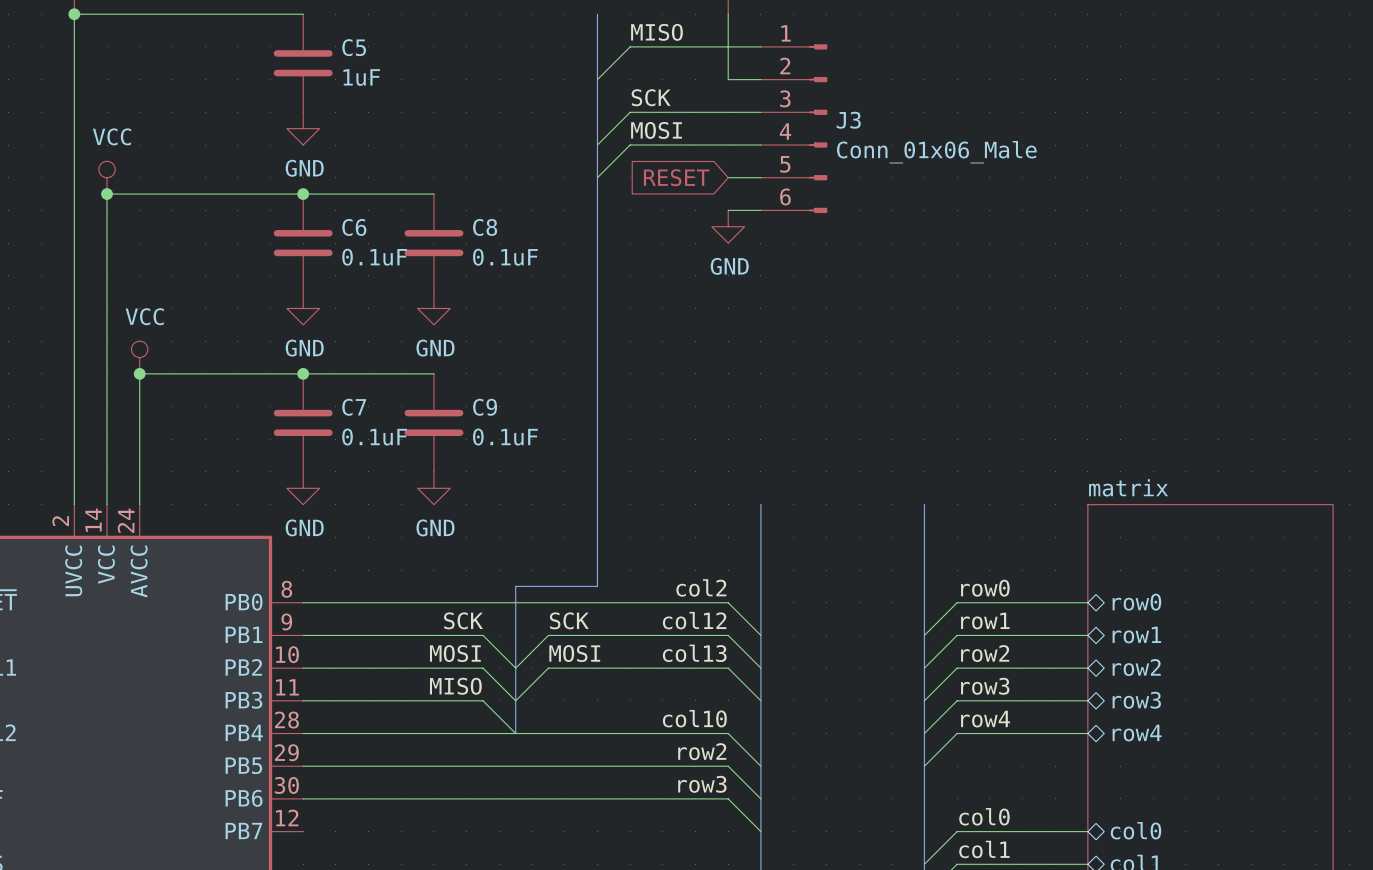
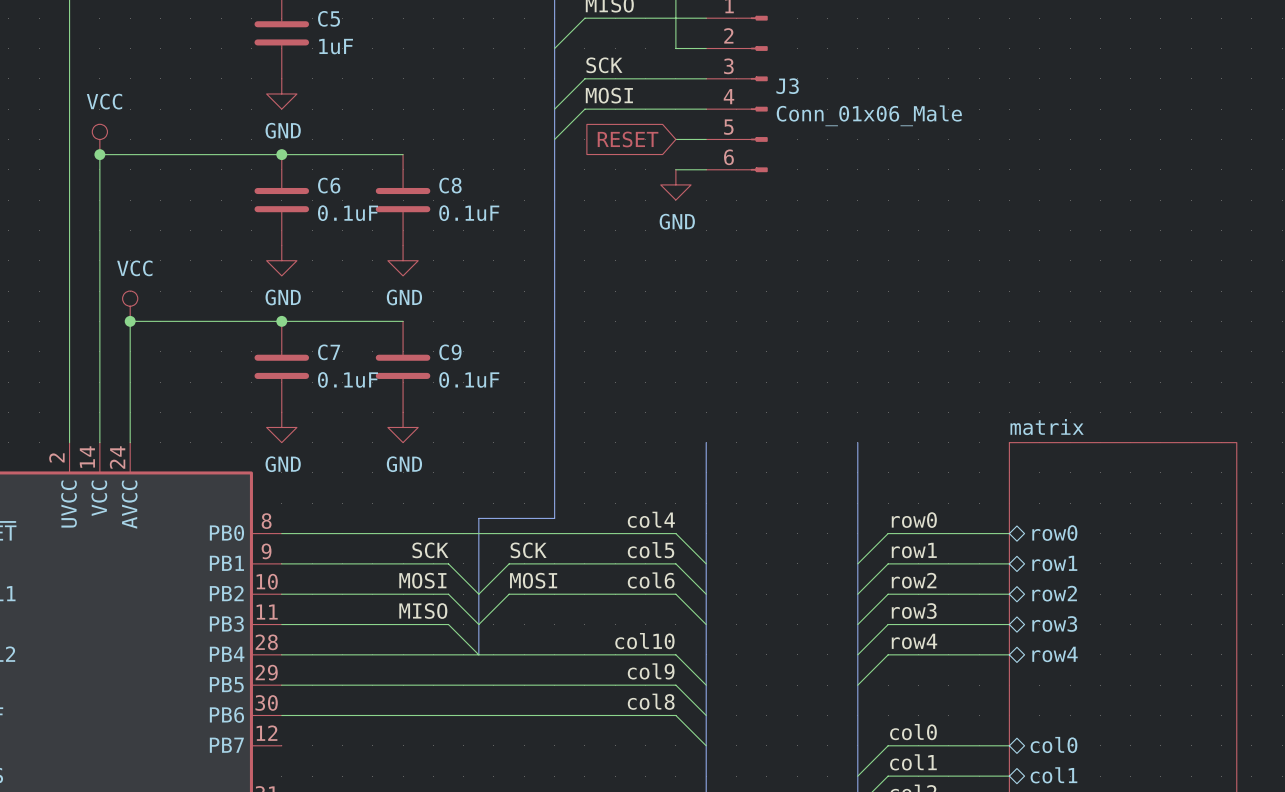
label: col2 (701, 587) -> col4 (651, 519)
label: col12 (694, 620) -> col5 (651, 550)
label: col13 (694, 653) -> col6 (651, 580)
label: row2 (702, 751) -> col9 (651, 671)
label: row3 (702, 784) -> col8 (651, 701)

